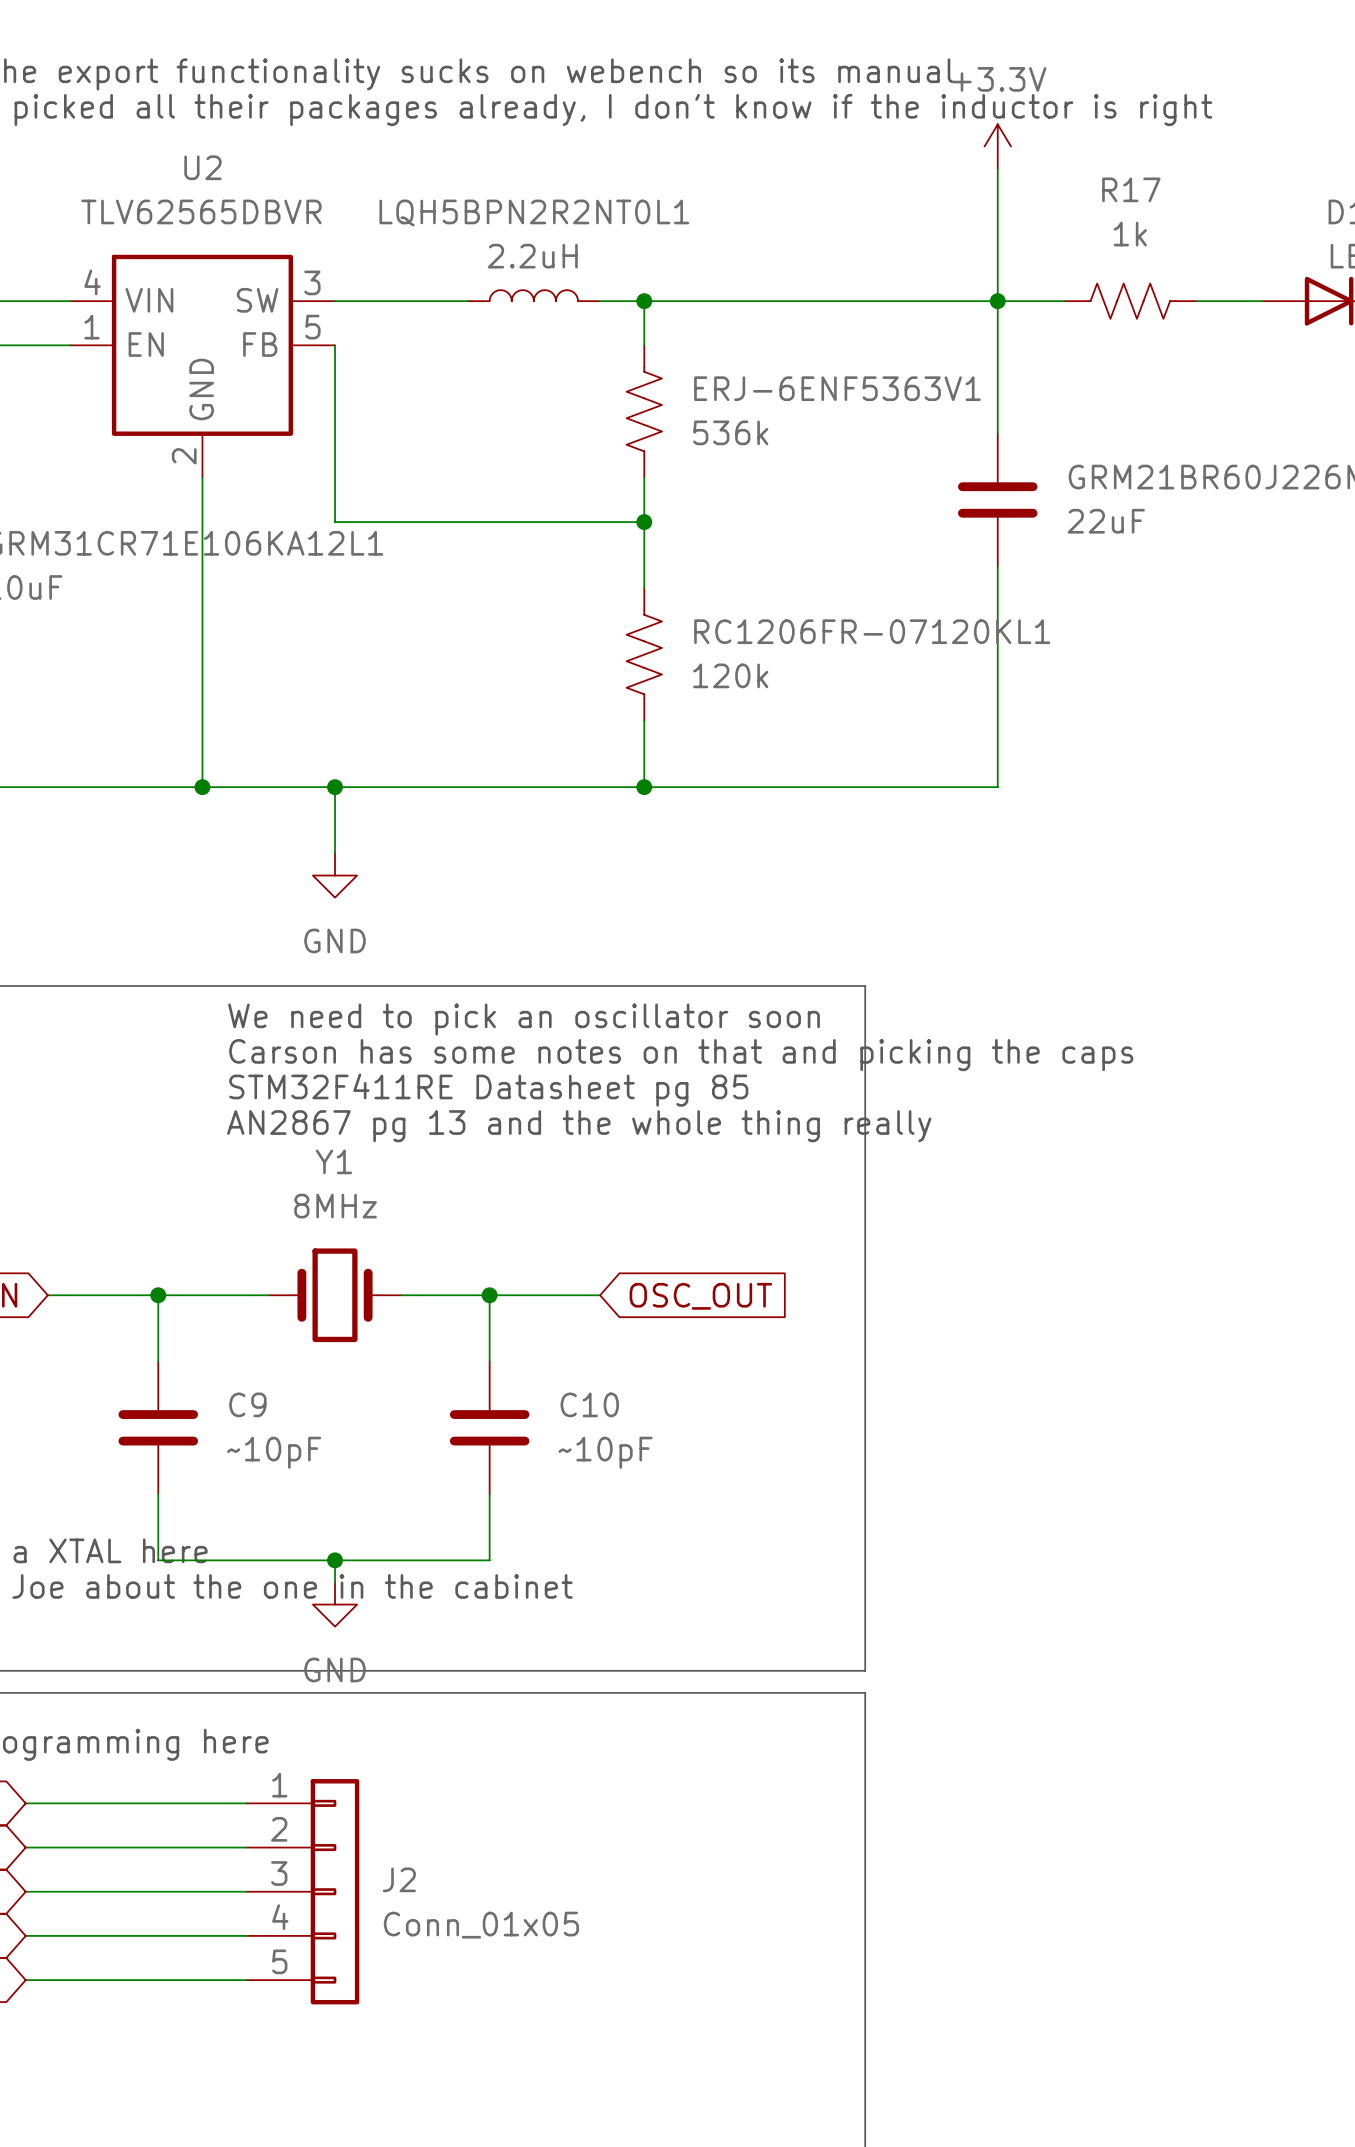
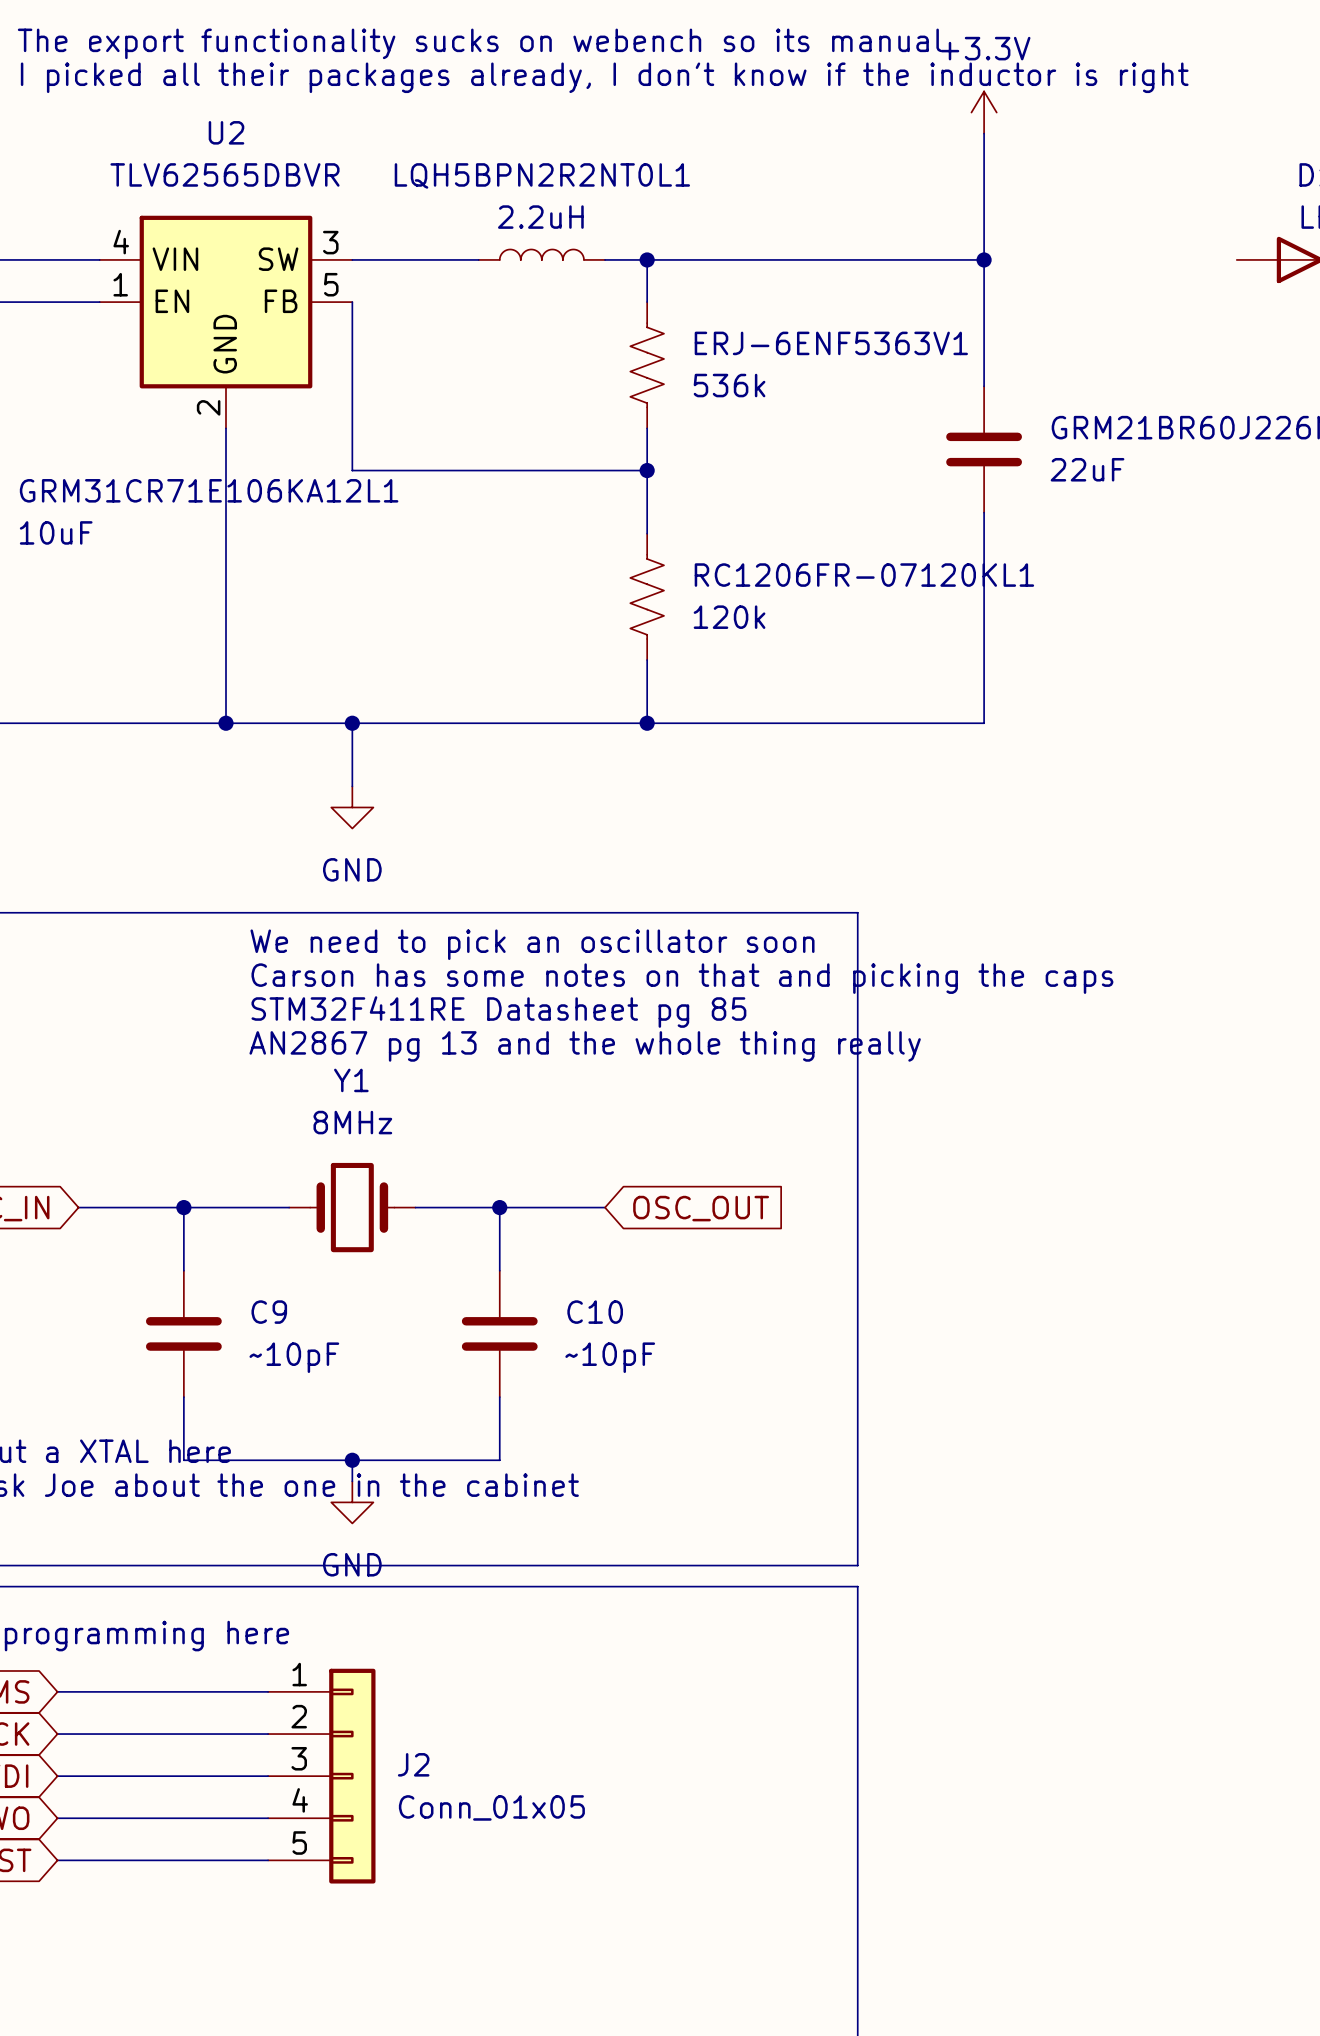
wire: (997, 301) (1064, 301) -> none
R17: 1k (1130, 301) -> none
wire: (1196, 301) (1262, 301) -> none

